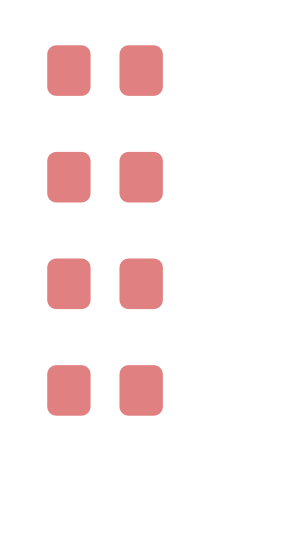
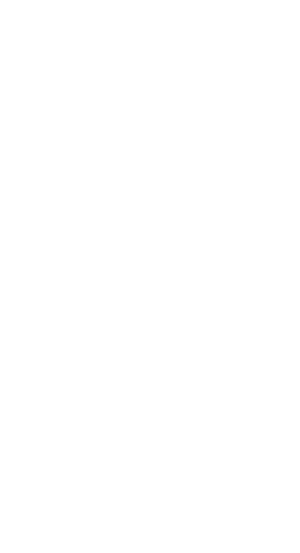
part: (105, 70) -> none
part: (105, 177) -> none
part: (105, 283) -> none
part: (105, 390) -> none

